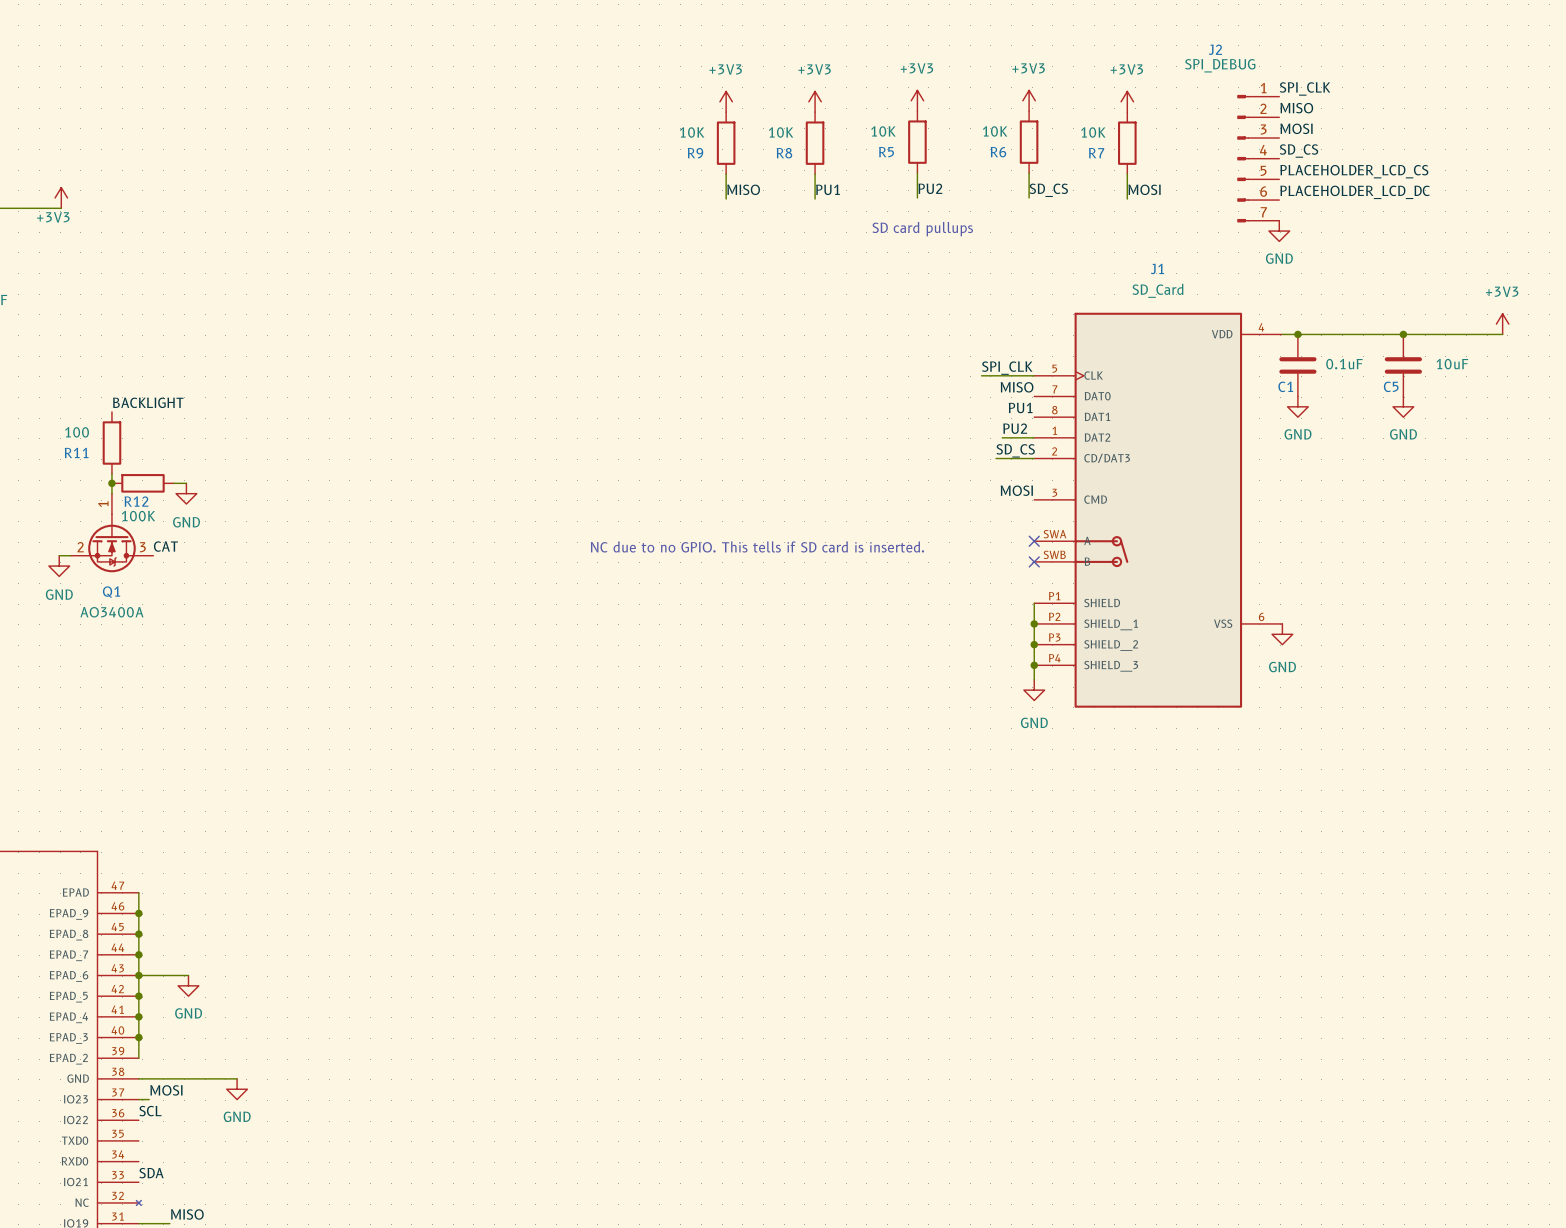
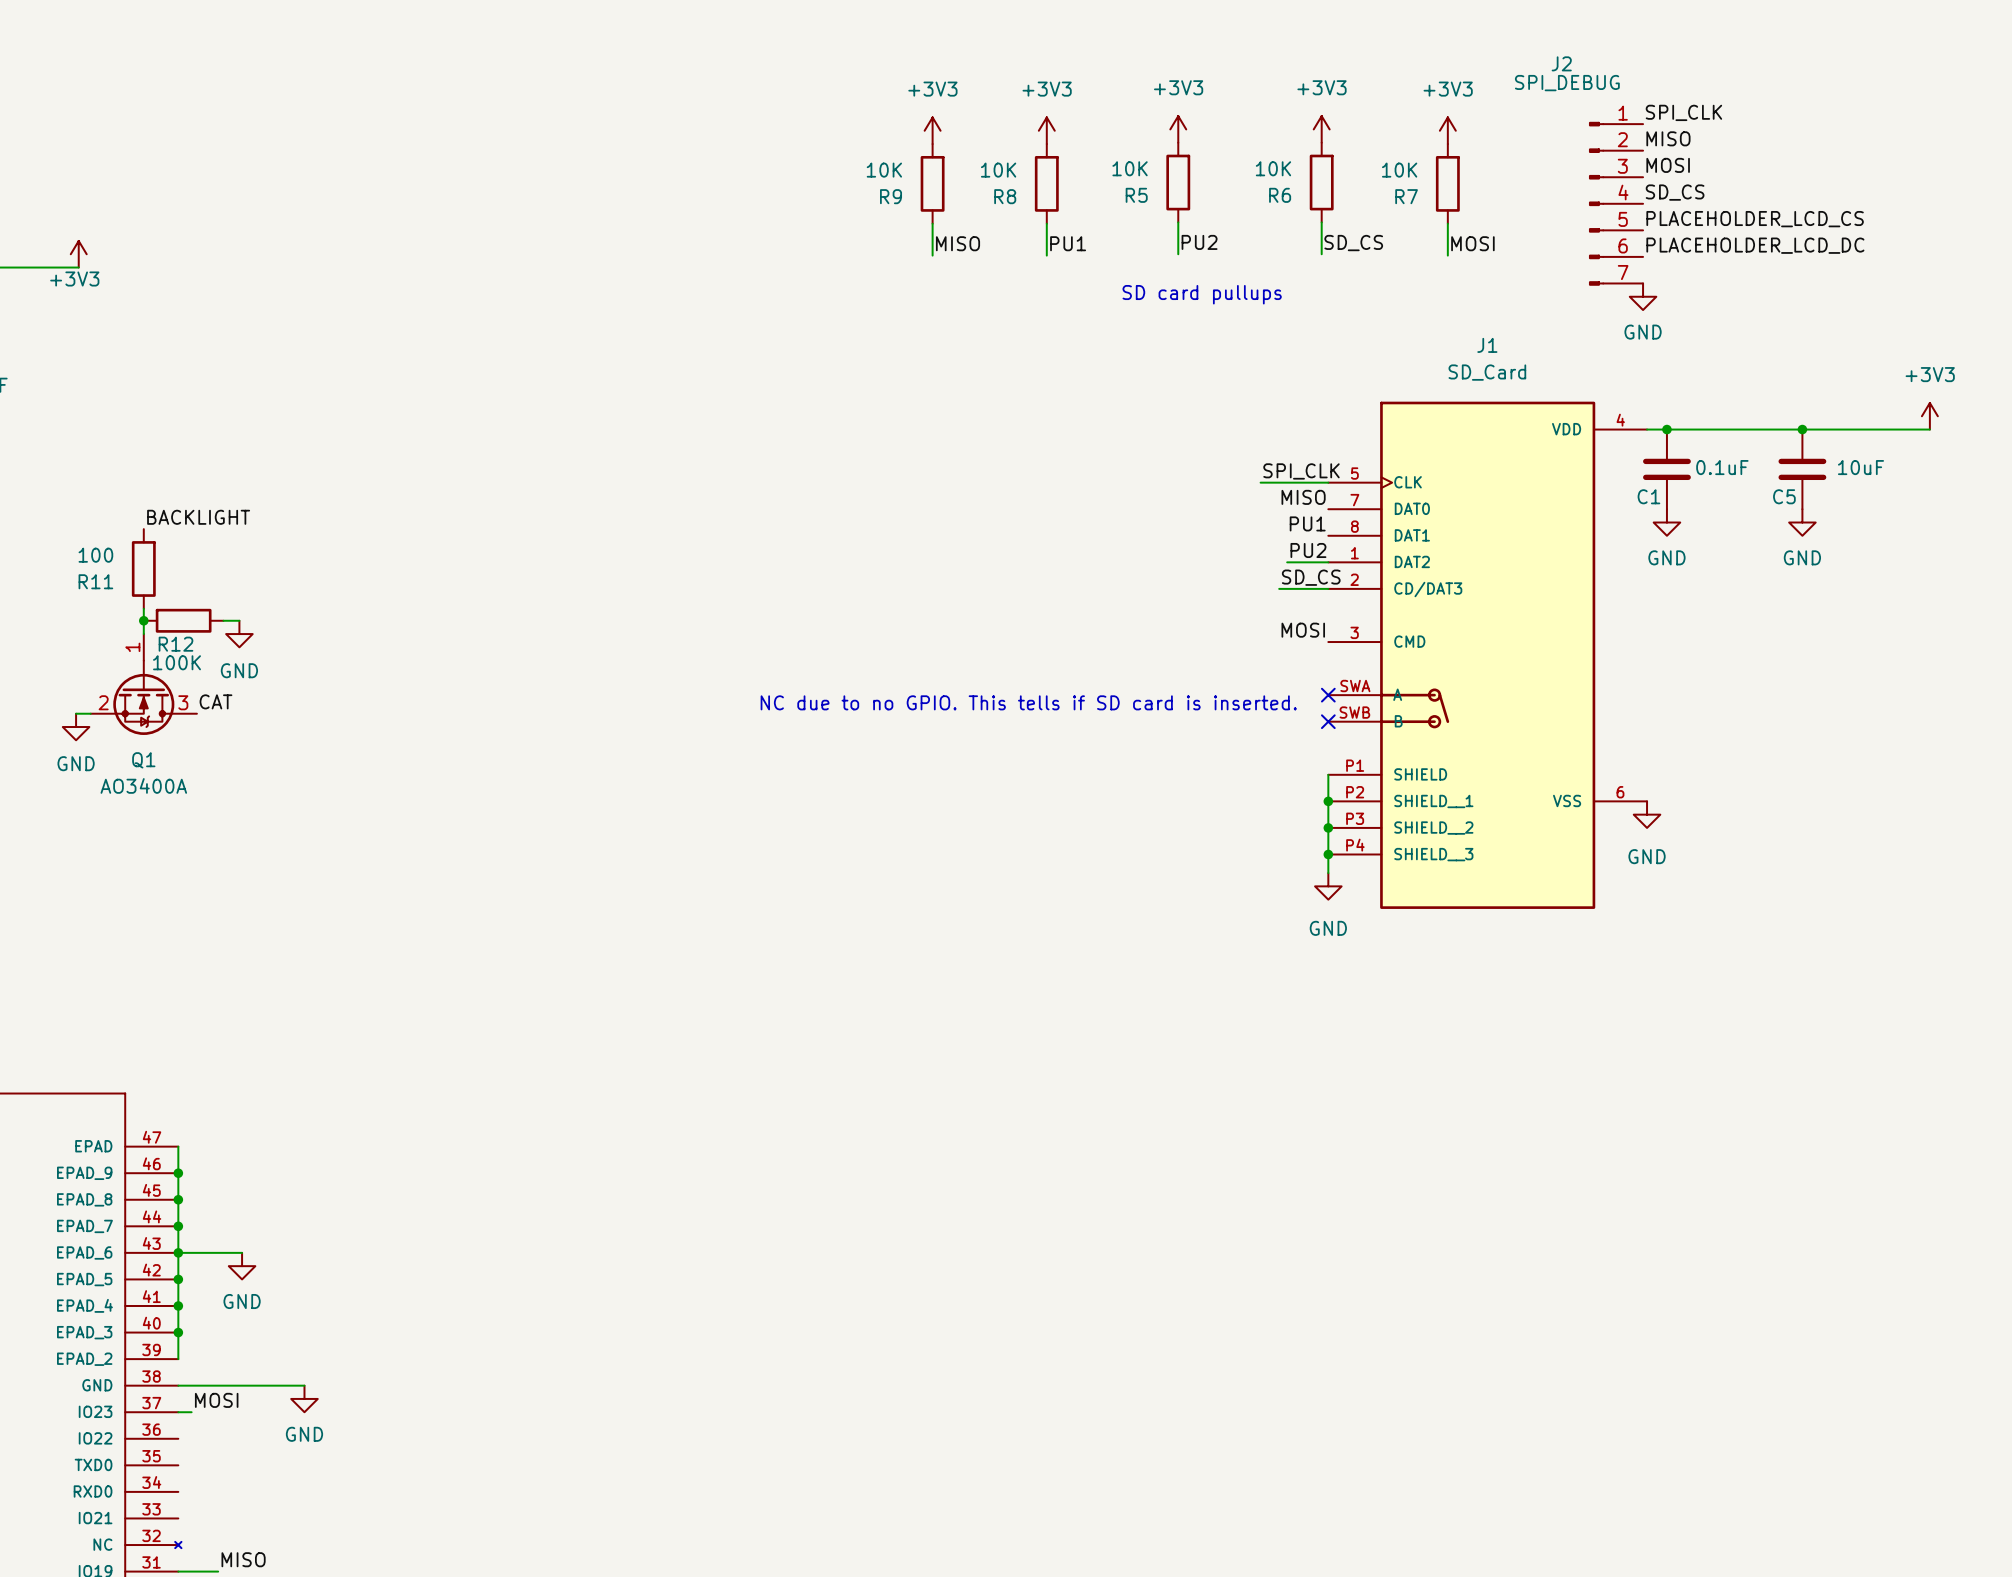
label: SCL (150, 1111) -> none
label: SDA (151, 1173) -> none

